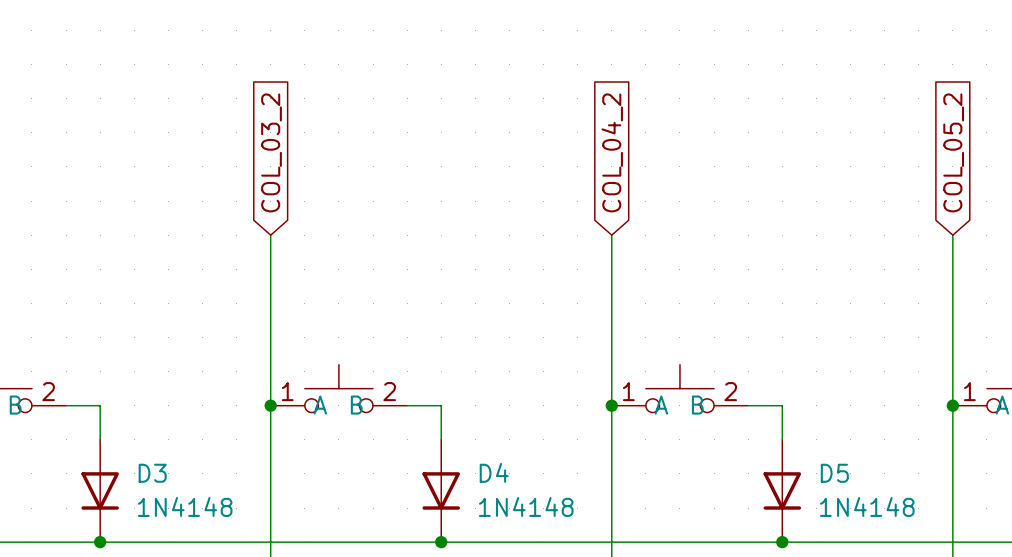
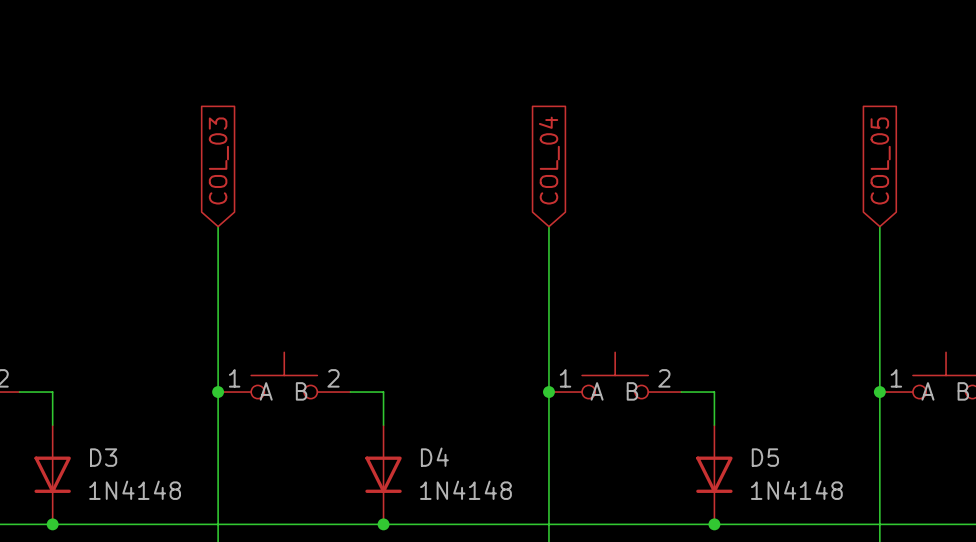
global label: COL_03_2 (271, 152) -> COL_03 (218, 160)
global label: COL_04_2 (612, 152) -> COL_04 (549, 160)
global label: COL_05_2 (953, 152) -> COL_05 (880, 160)

